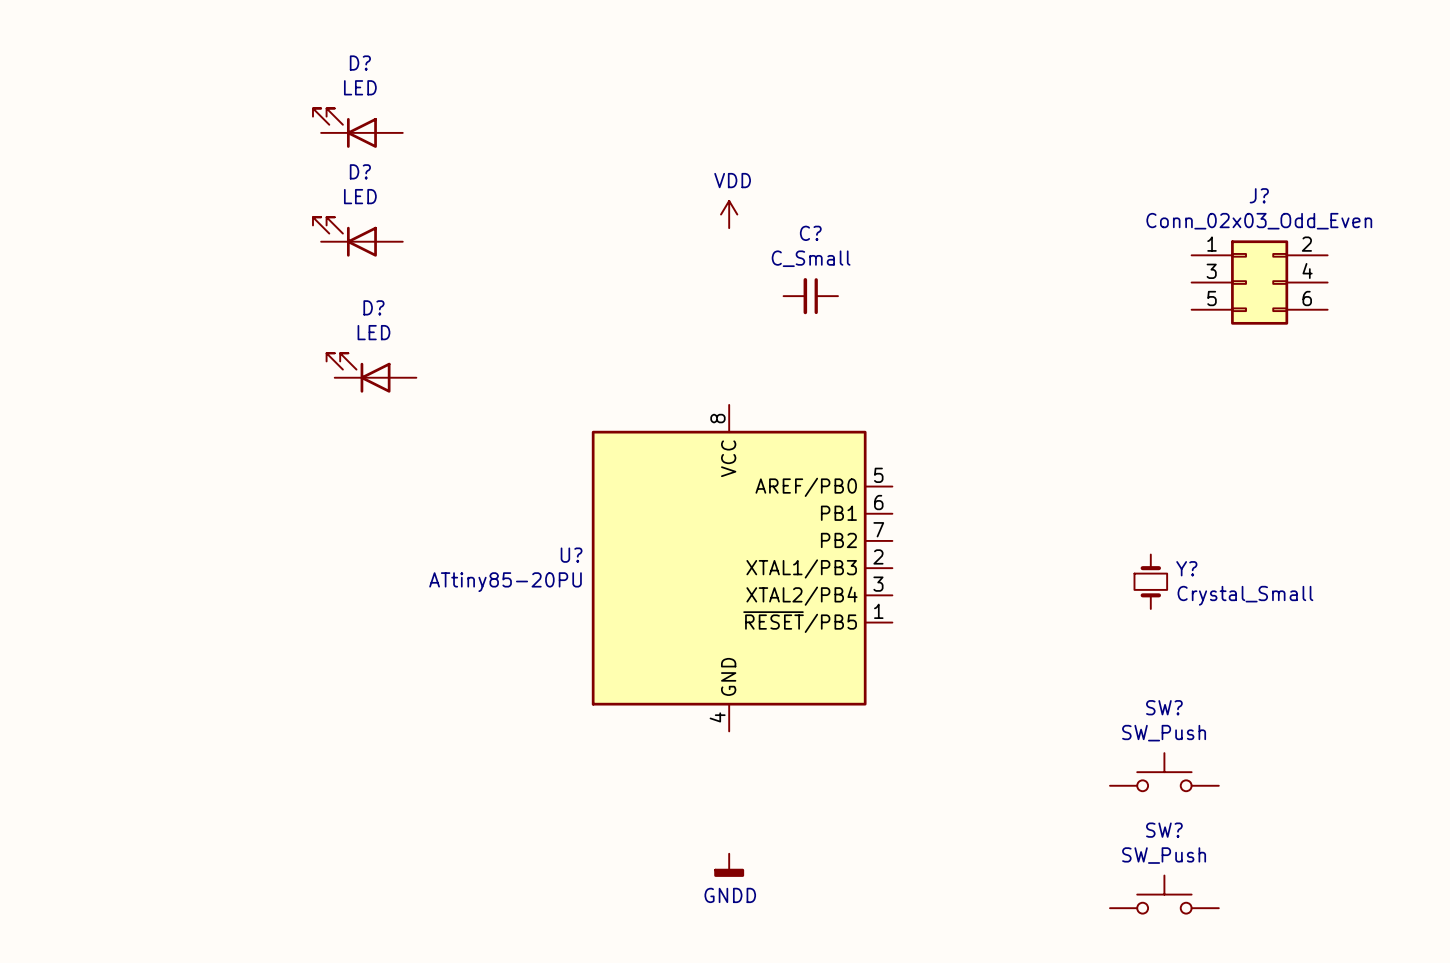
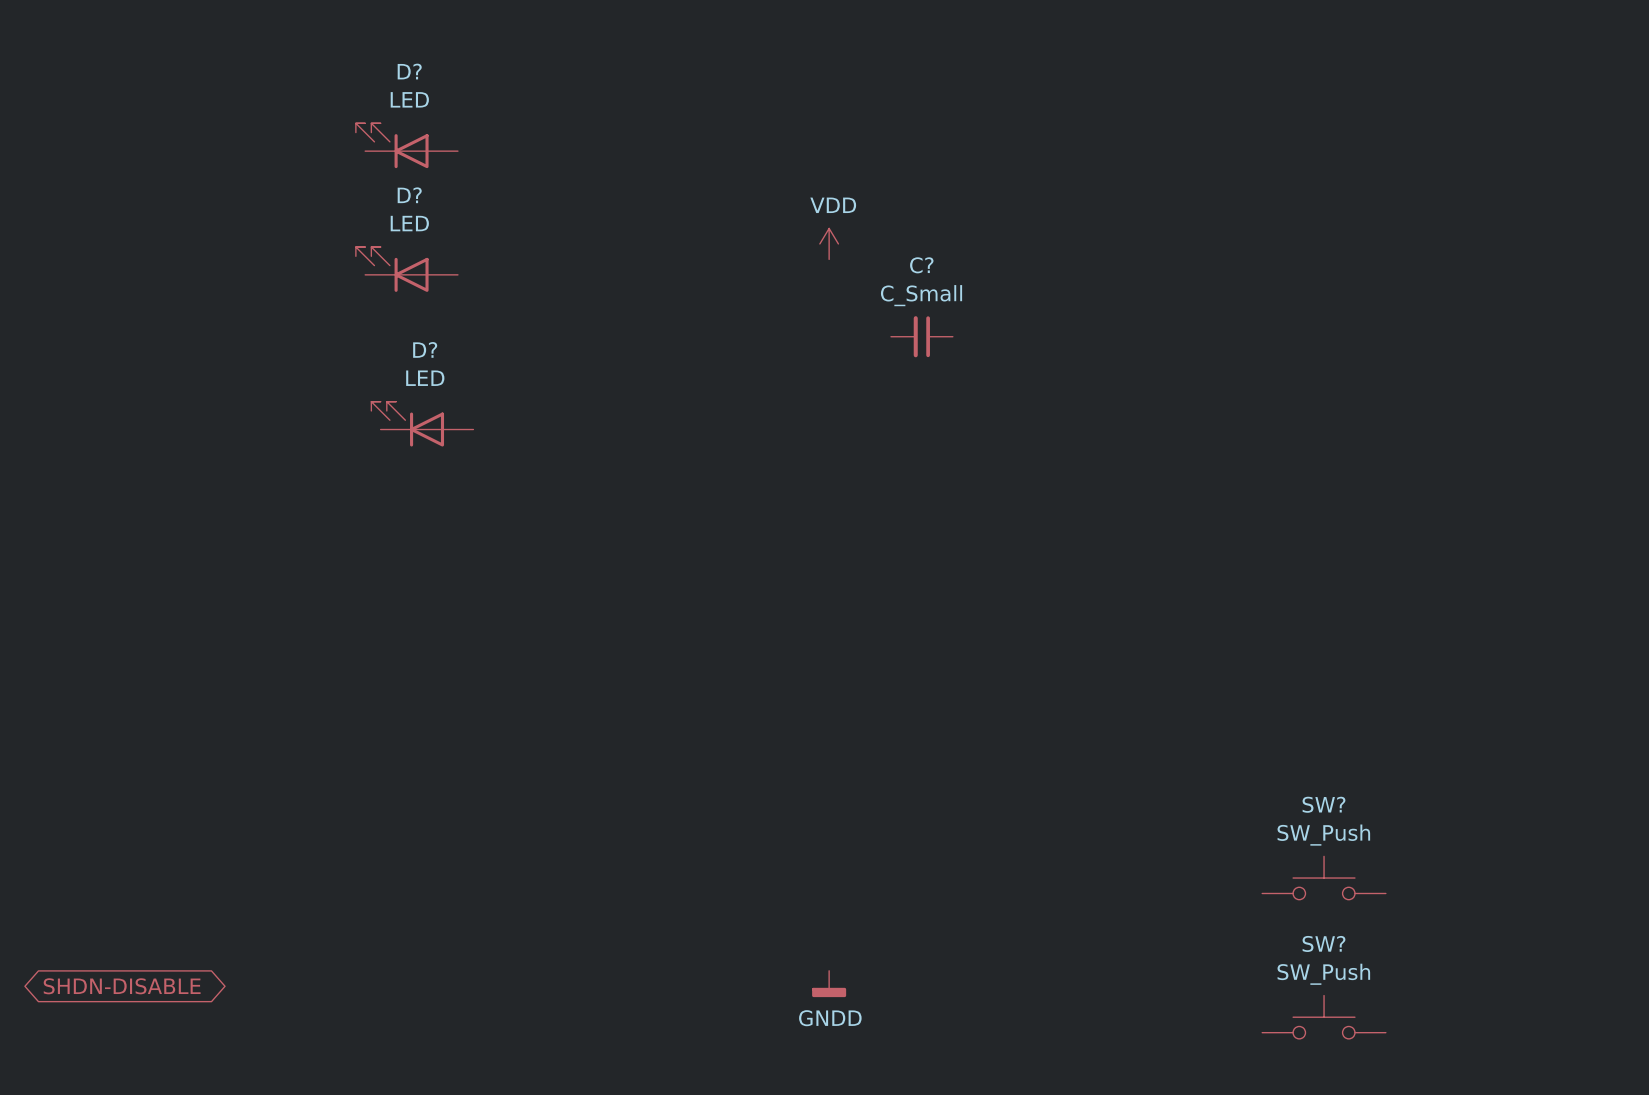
J?: Conn_02x03_Odd_Even (1259, 282) -> none
U?: ATtiny85-20PU (742, 568) -> none
Y?: Crystal_Small (1150, 581) -> none
global label: none -> SHDN-DISABLE (122, 986)

